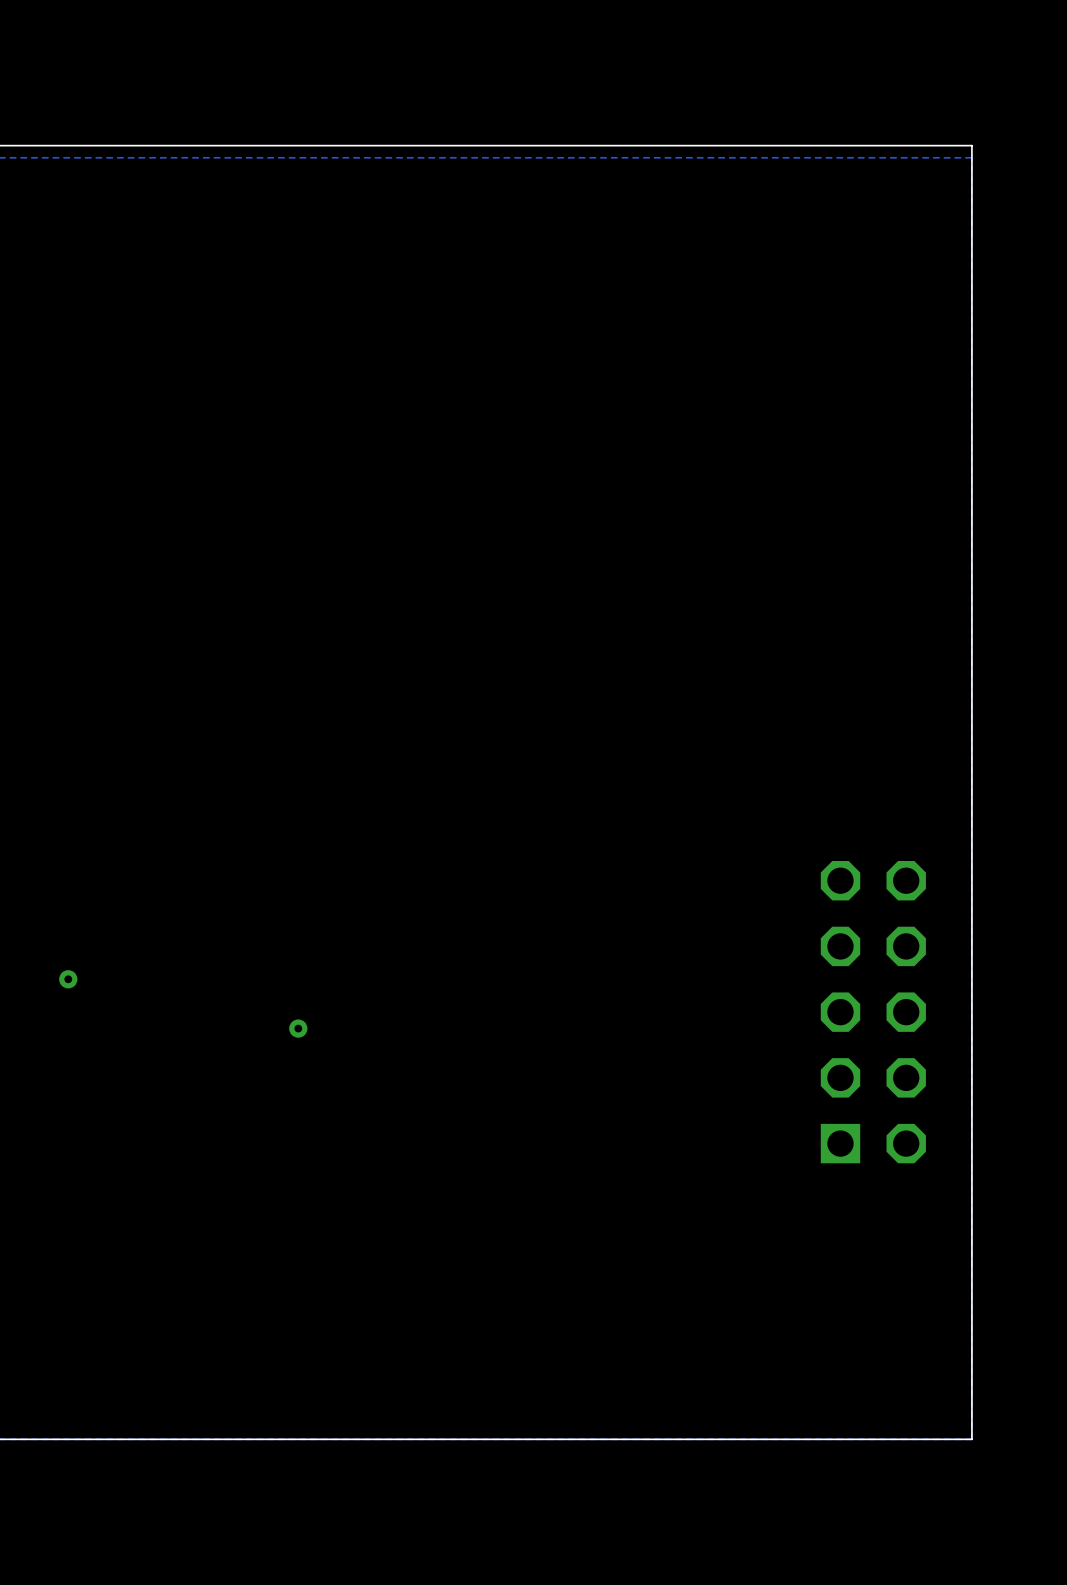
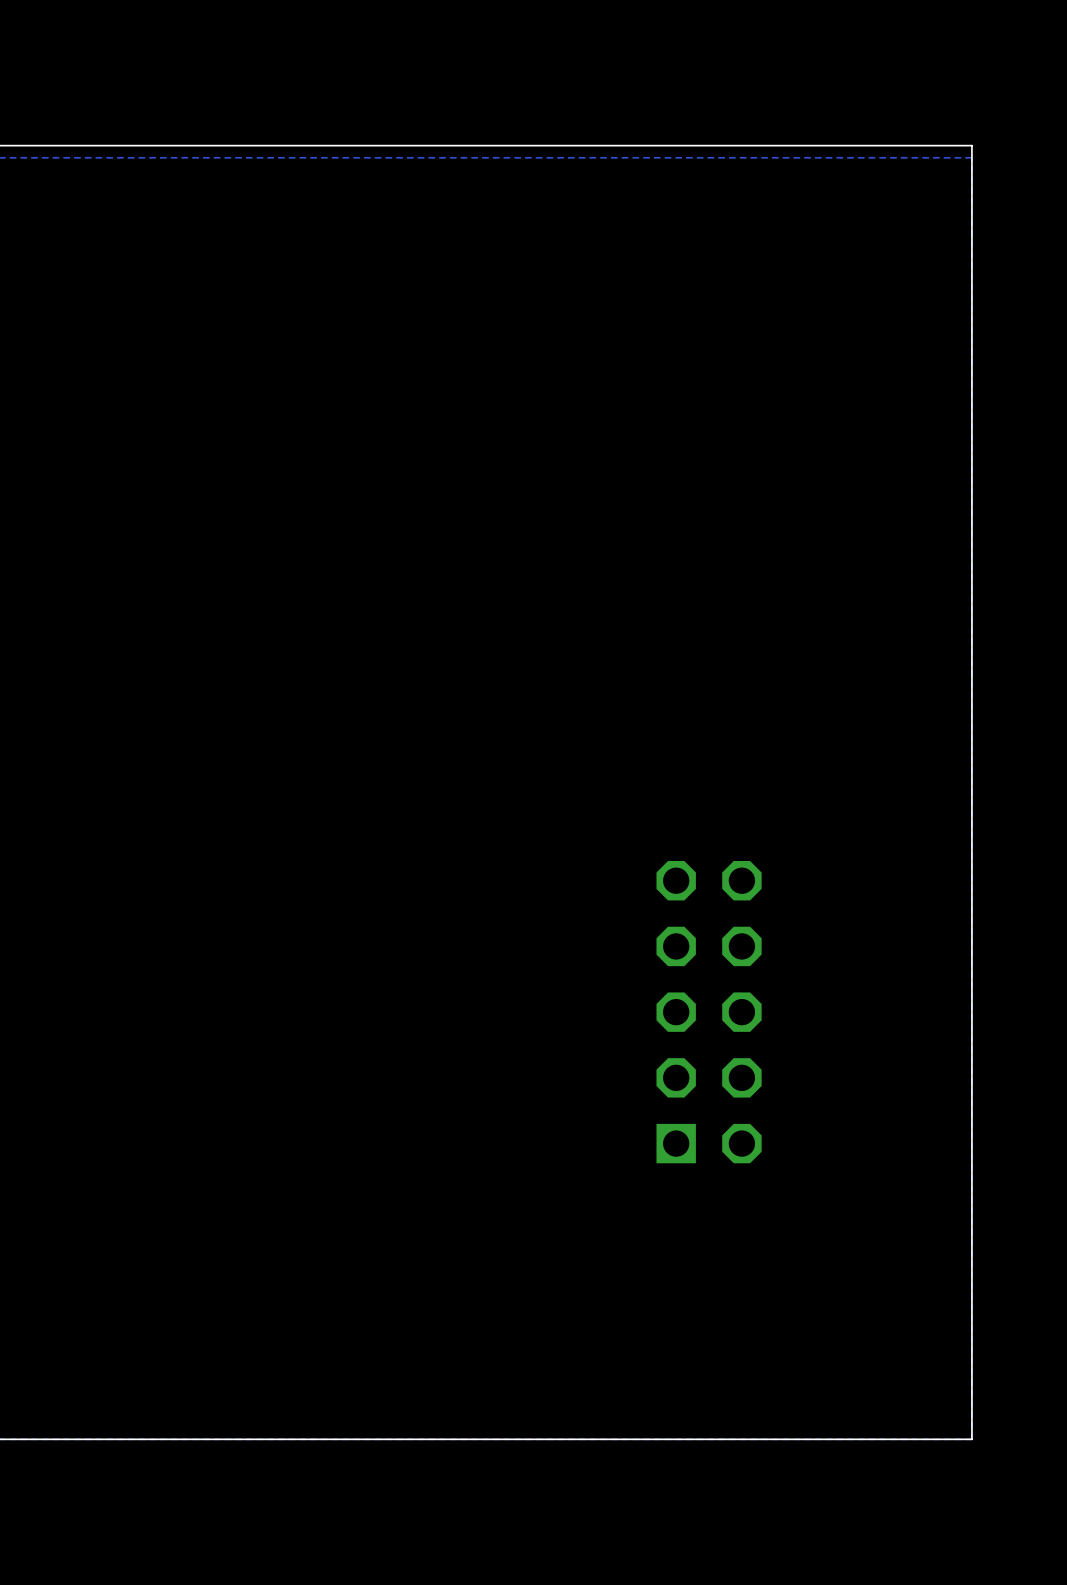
via: (68, 979) -> none
part position: (873, 1012) -> (709, 1012)
via: (298, 1028) -> none

